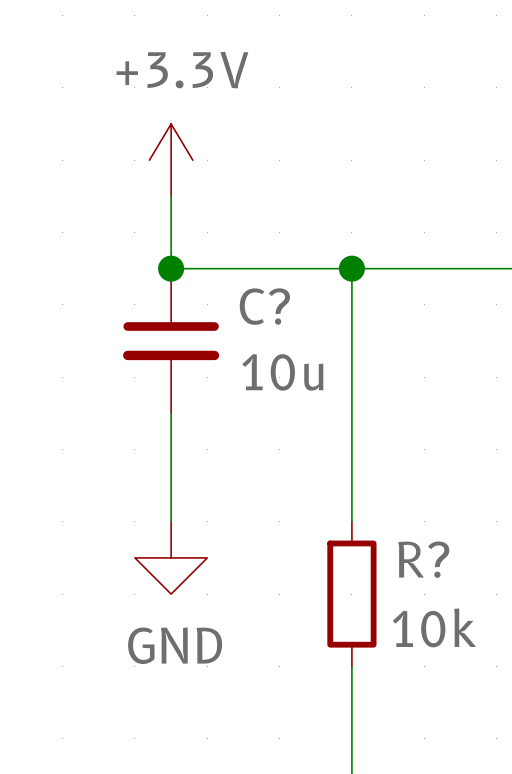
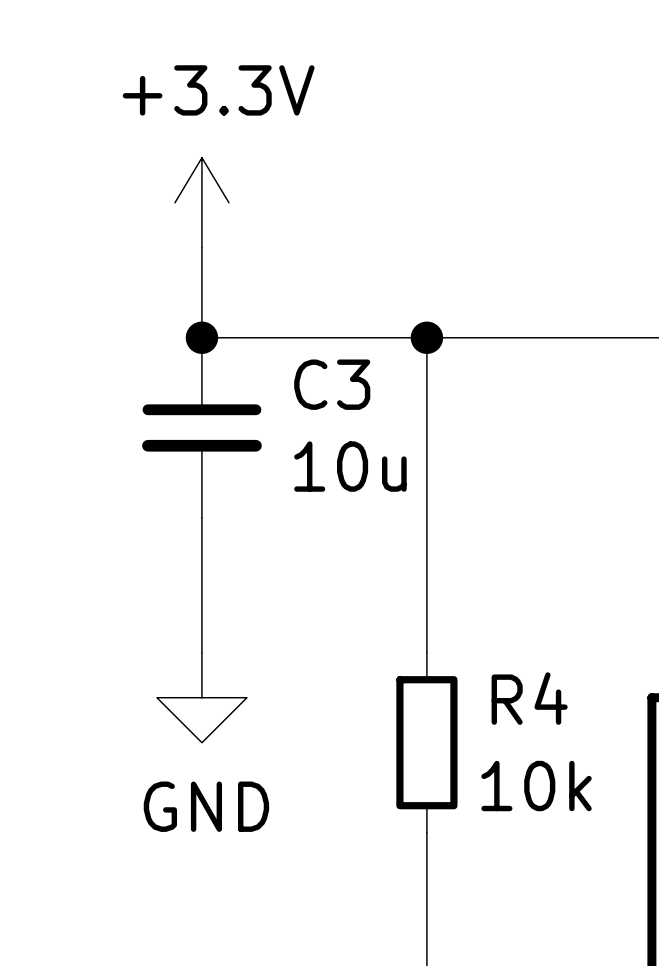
C? name: C? (264, 306) -> C3 (332, 384)
R? name: R? (423, 559) -> R4 (529, 698)

